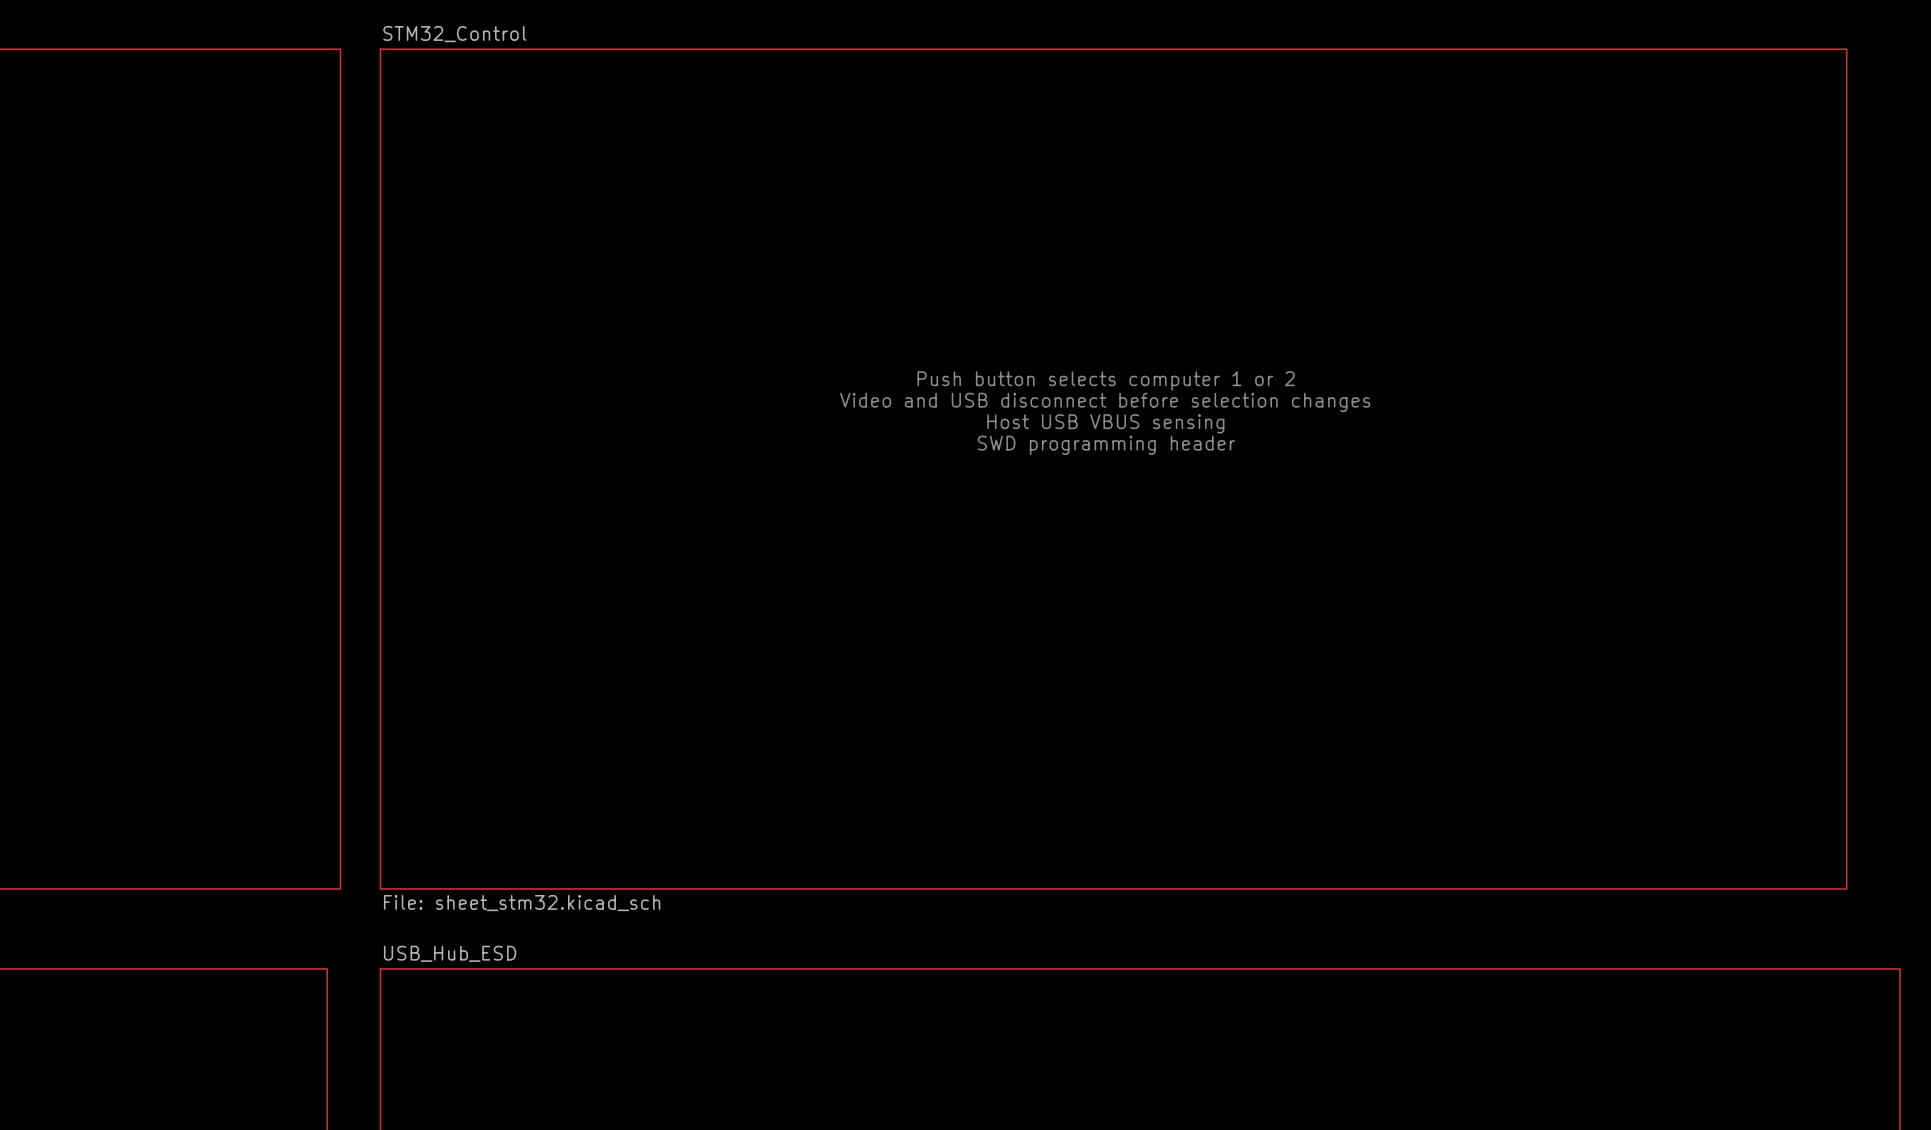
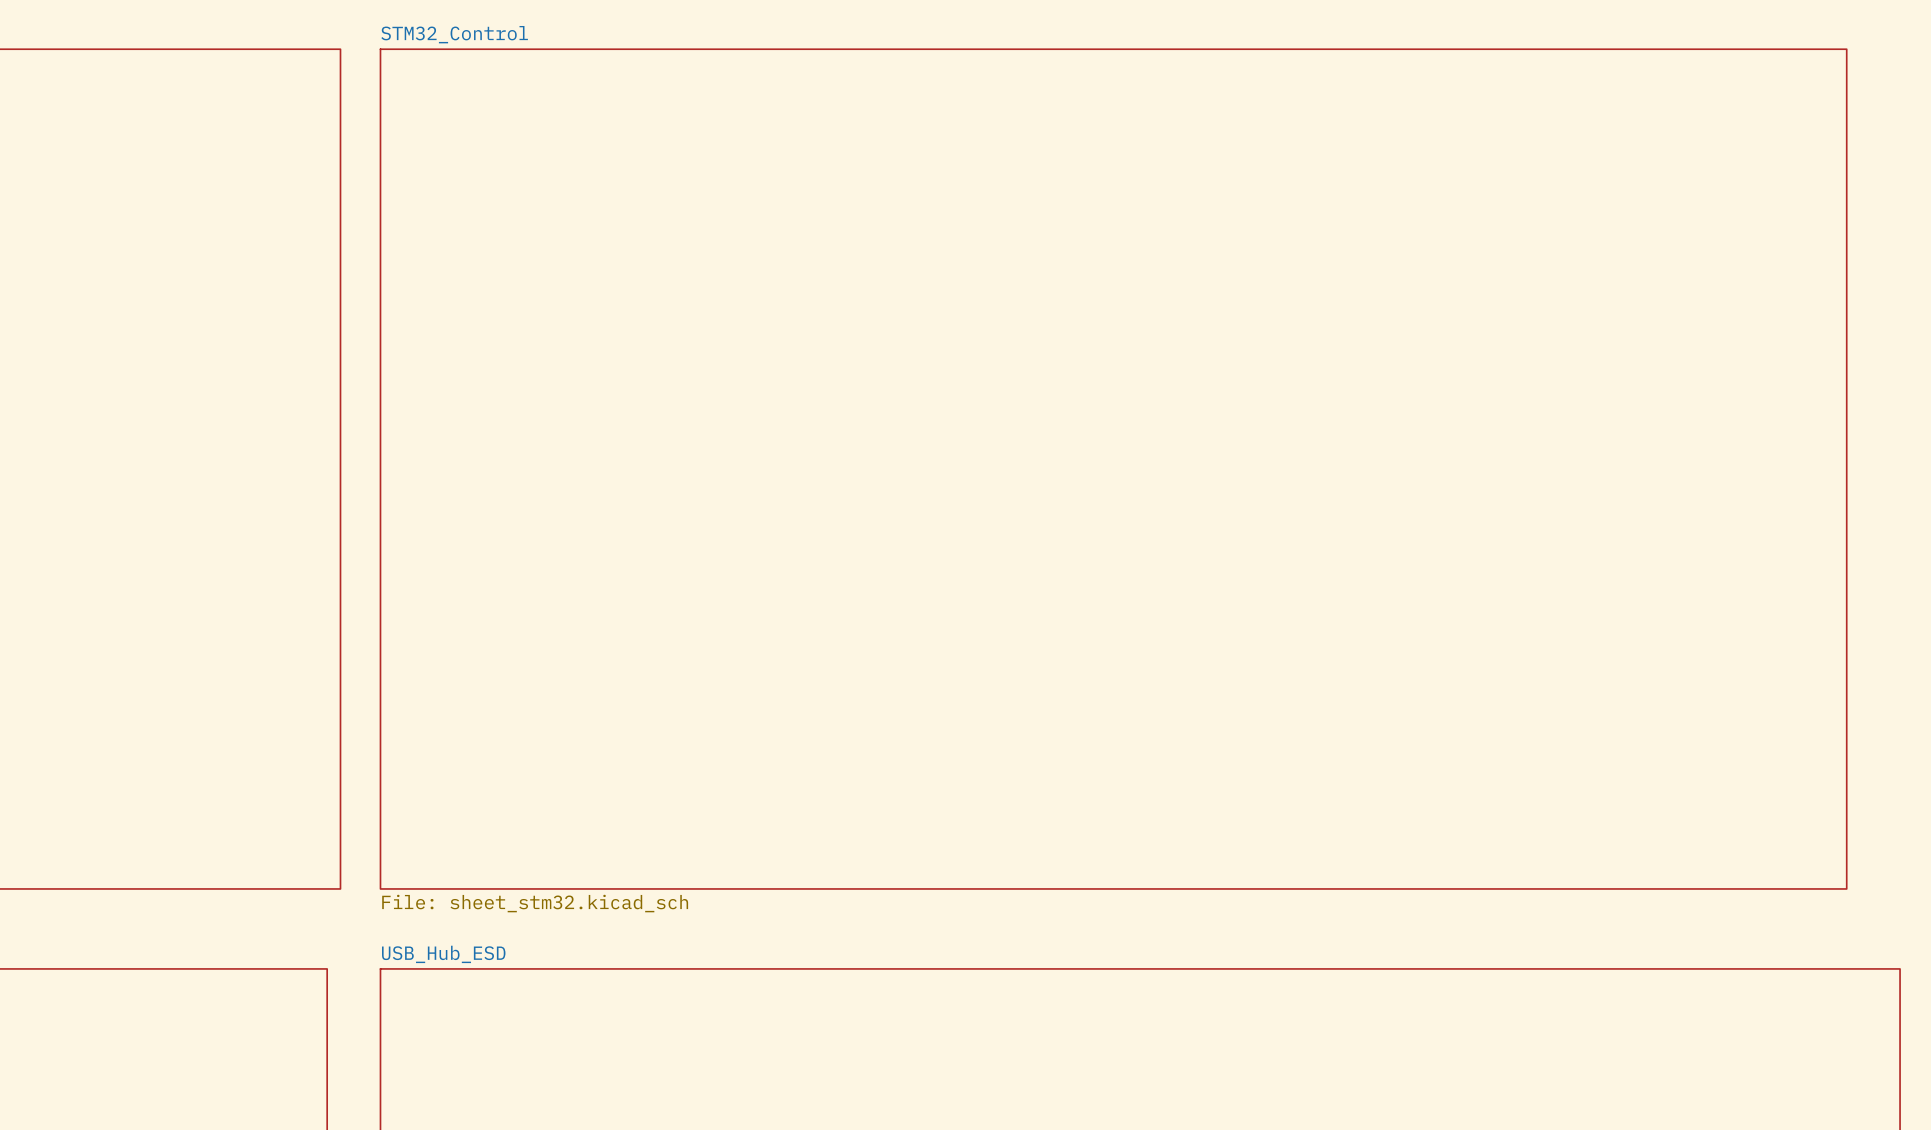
text: Push button selects computer 1 or 2 (1106, 380) -> none
text: Video and USB disconnect before selection changes (1105, 402) -> none
text: Host USB VBUS sensing (1105, 423) -> none
text: SWD programming header (1106, 445) -> none

